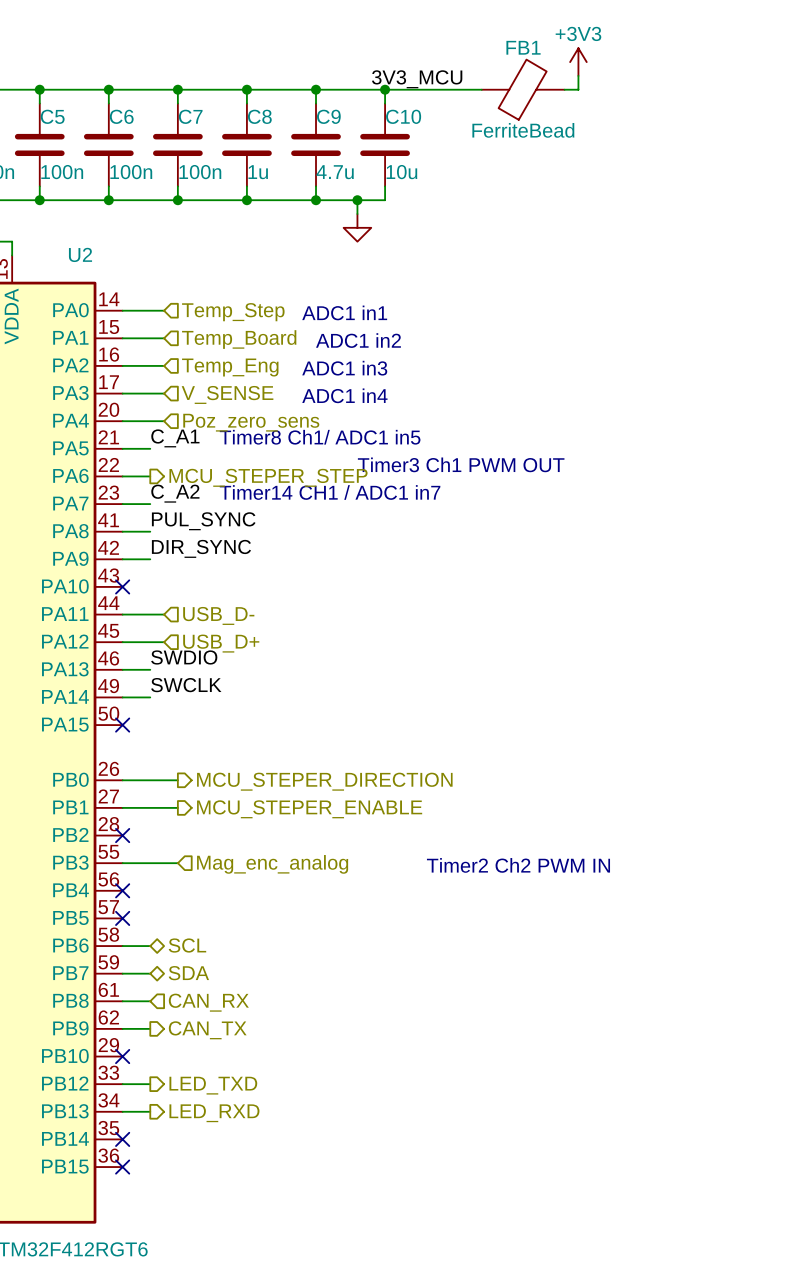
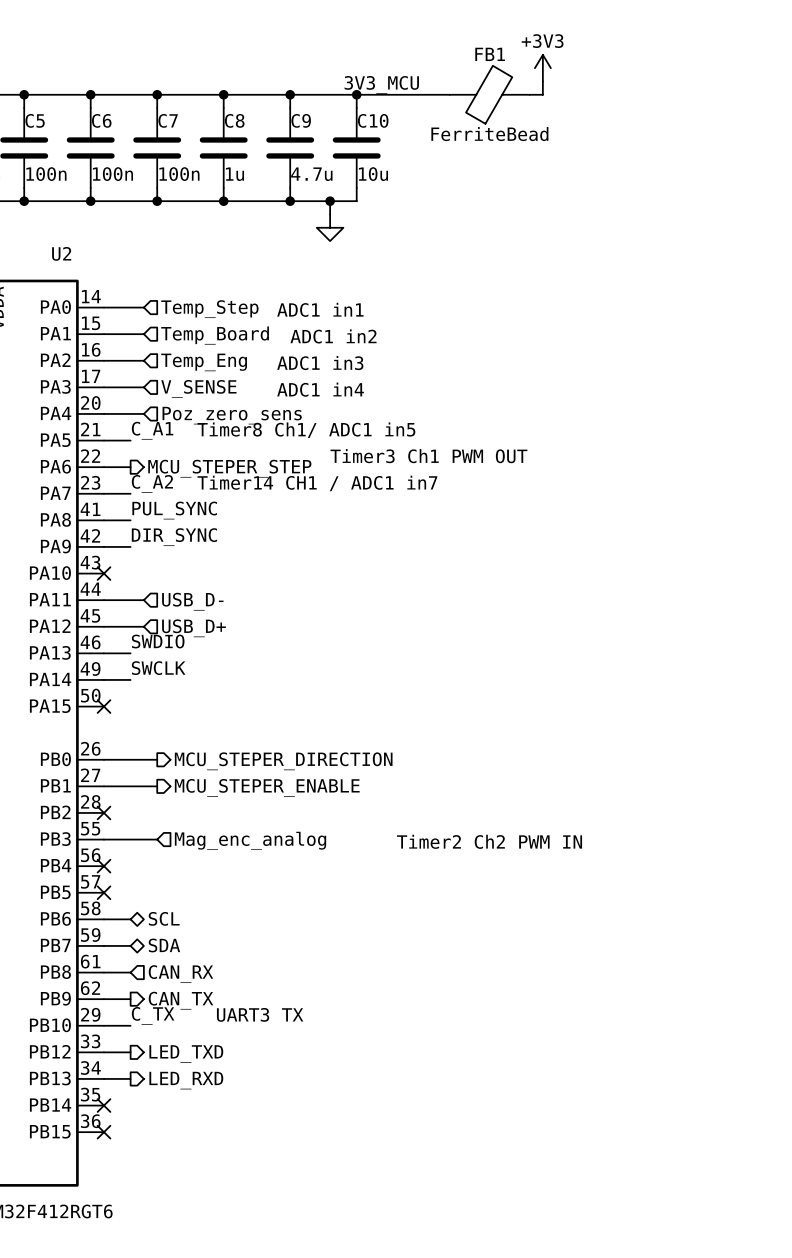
text: none -> UART3 TX (260, 1014)
label: none -> C_TX (153, 1015)
wire: none -> (104, 1025) (130, 1025)
no-connect mark: (122, 1056) -> none

